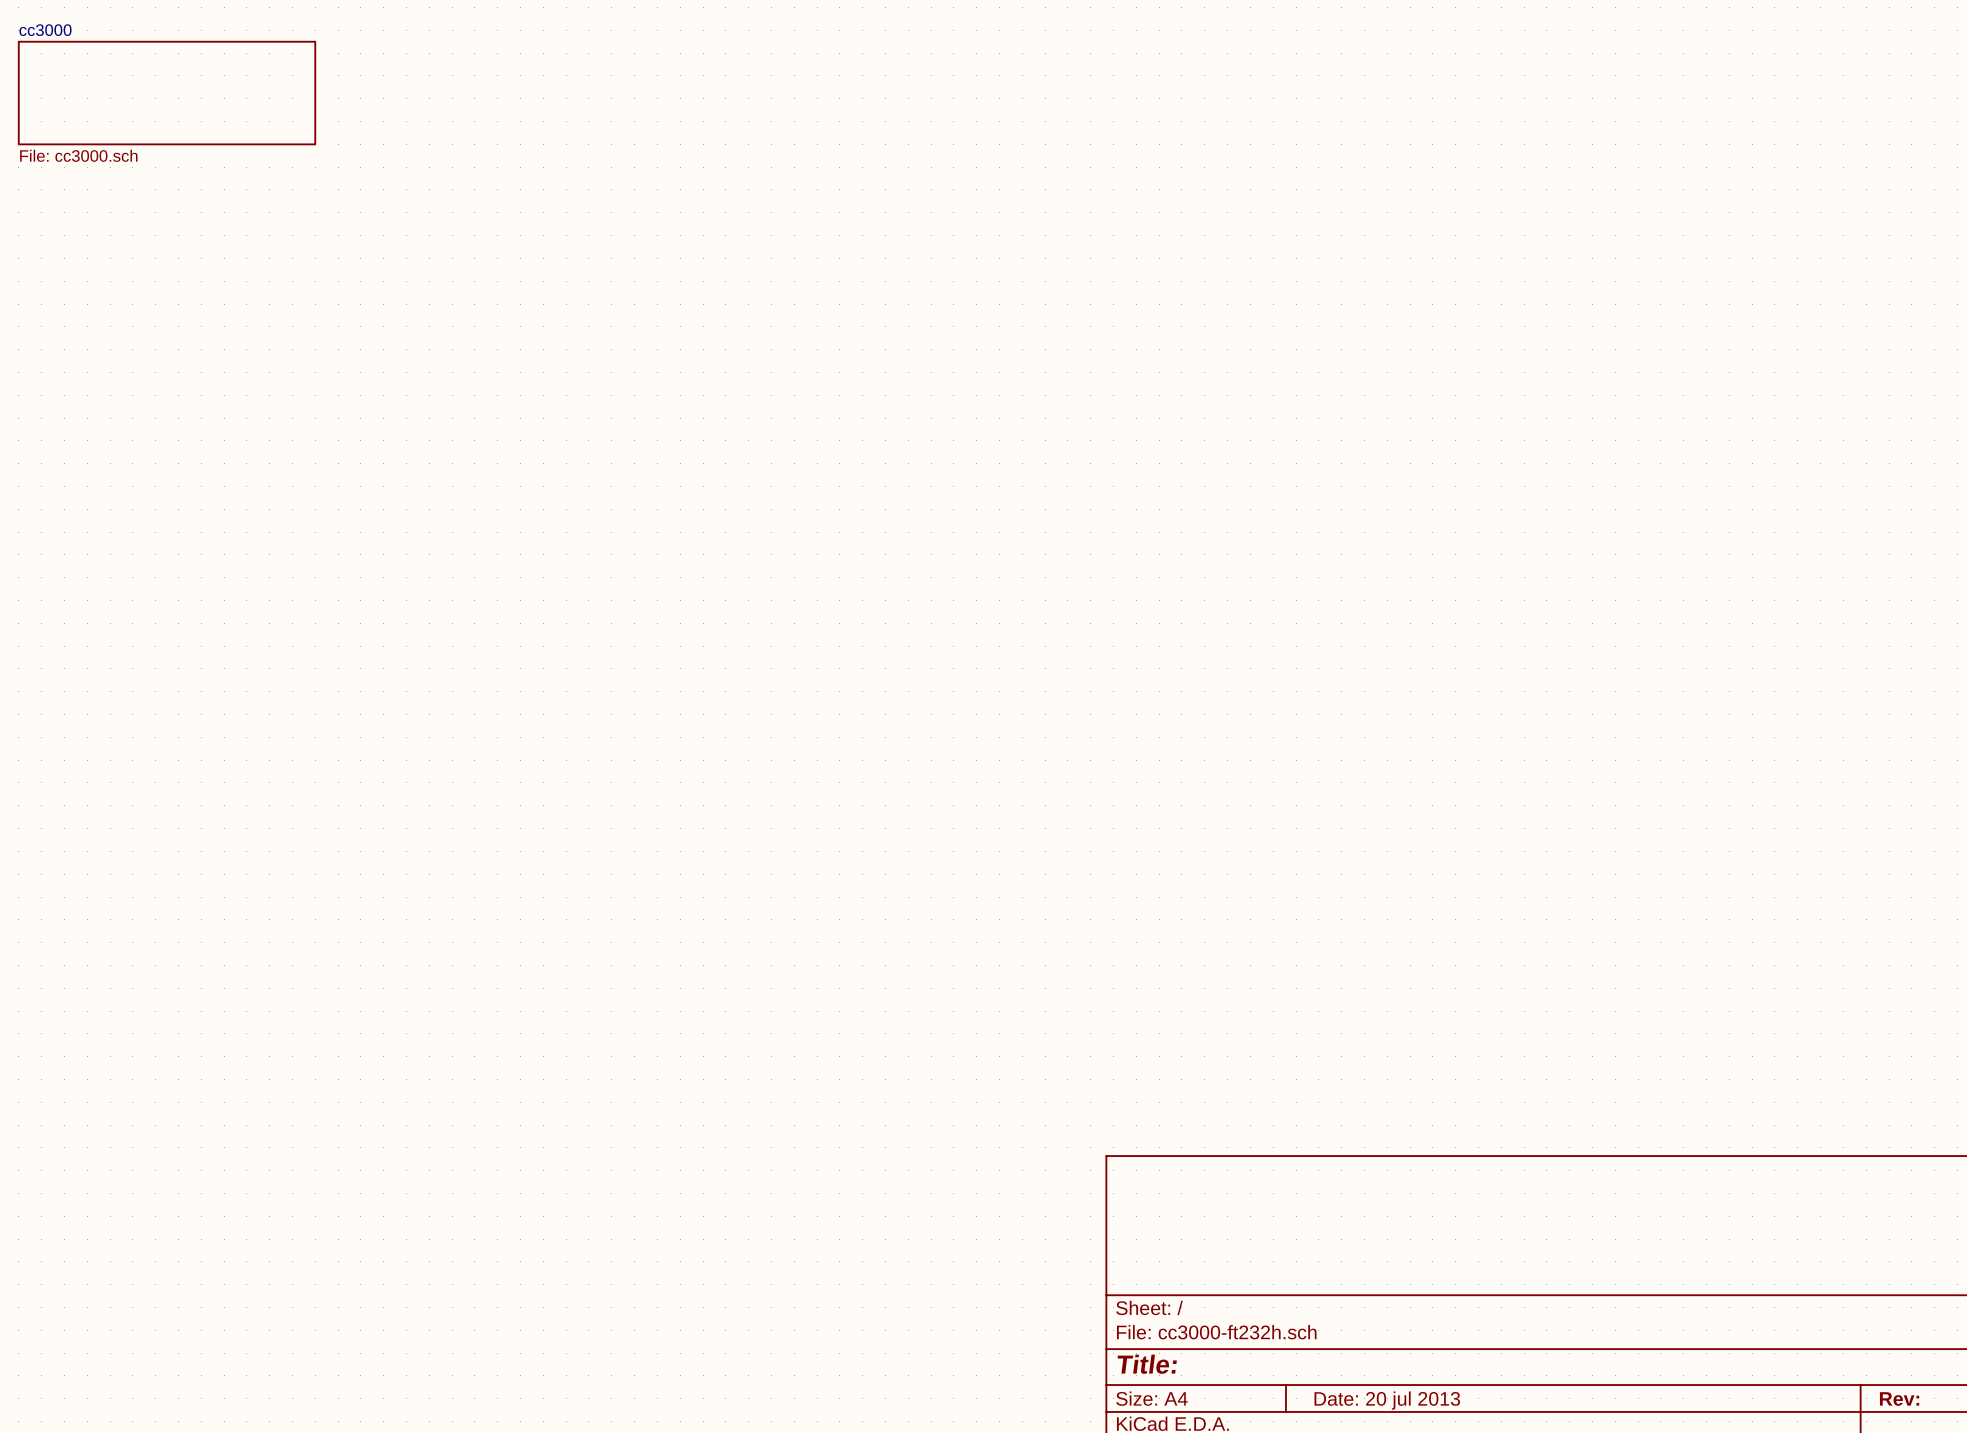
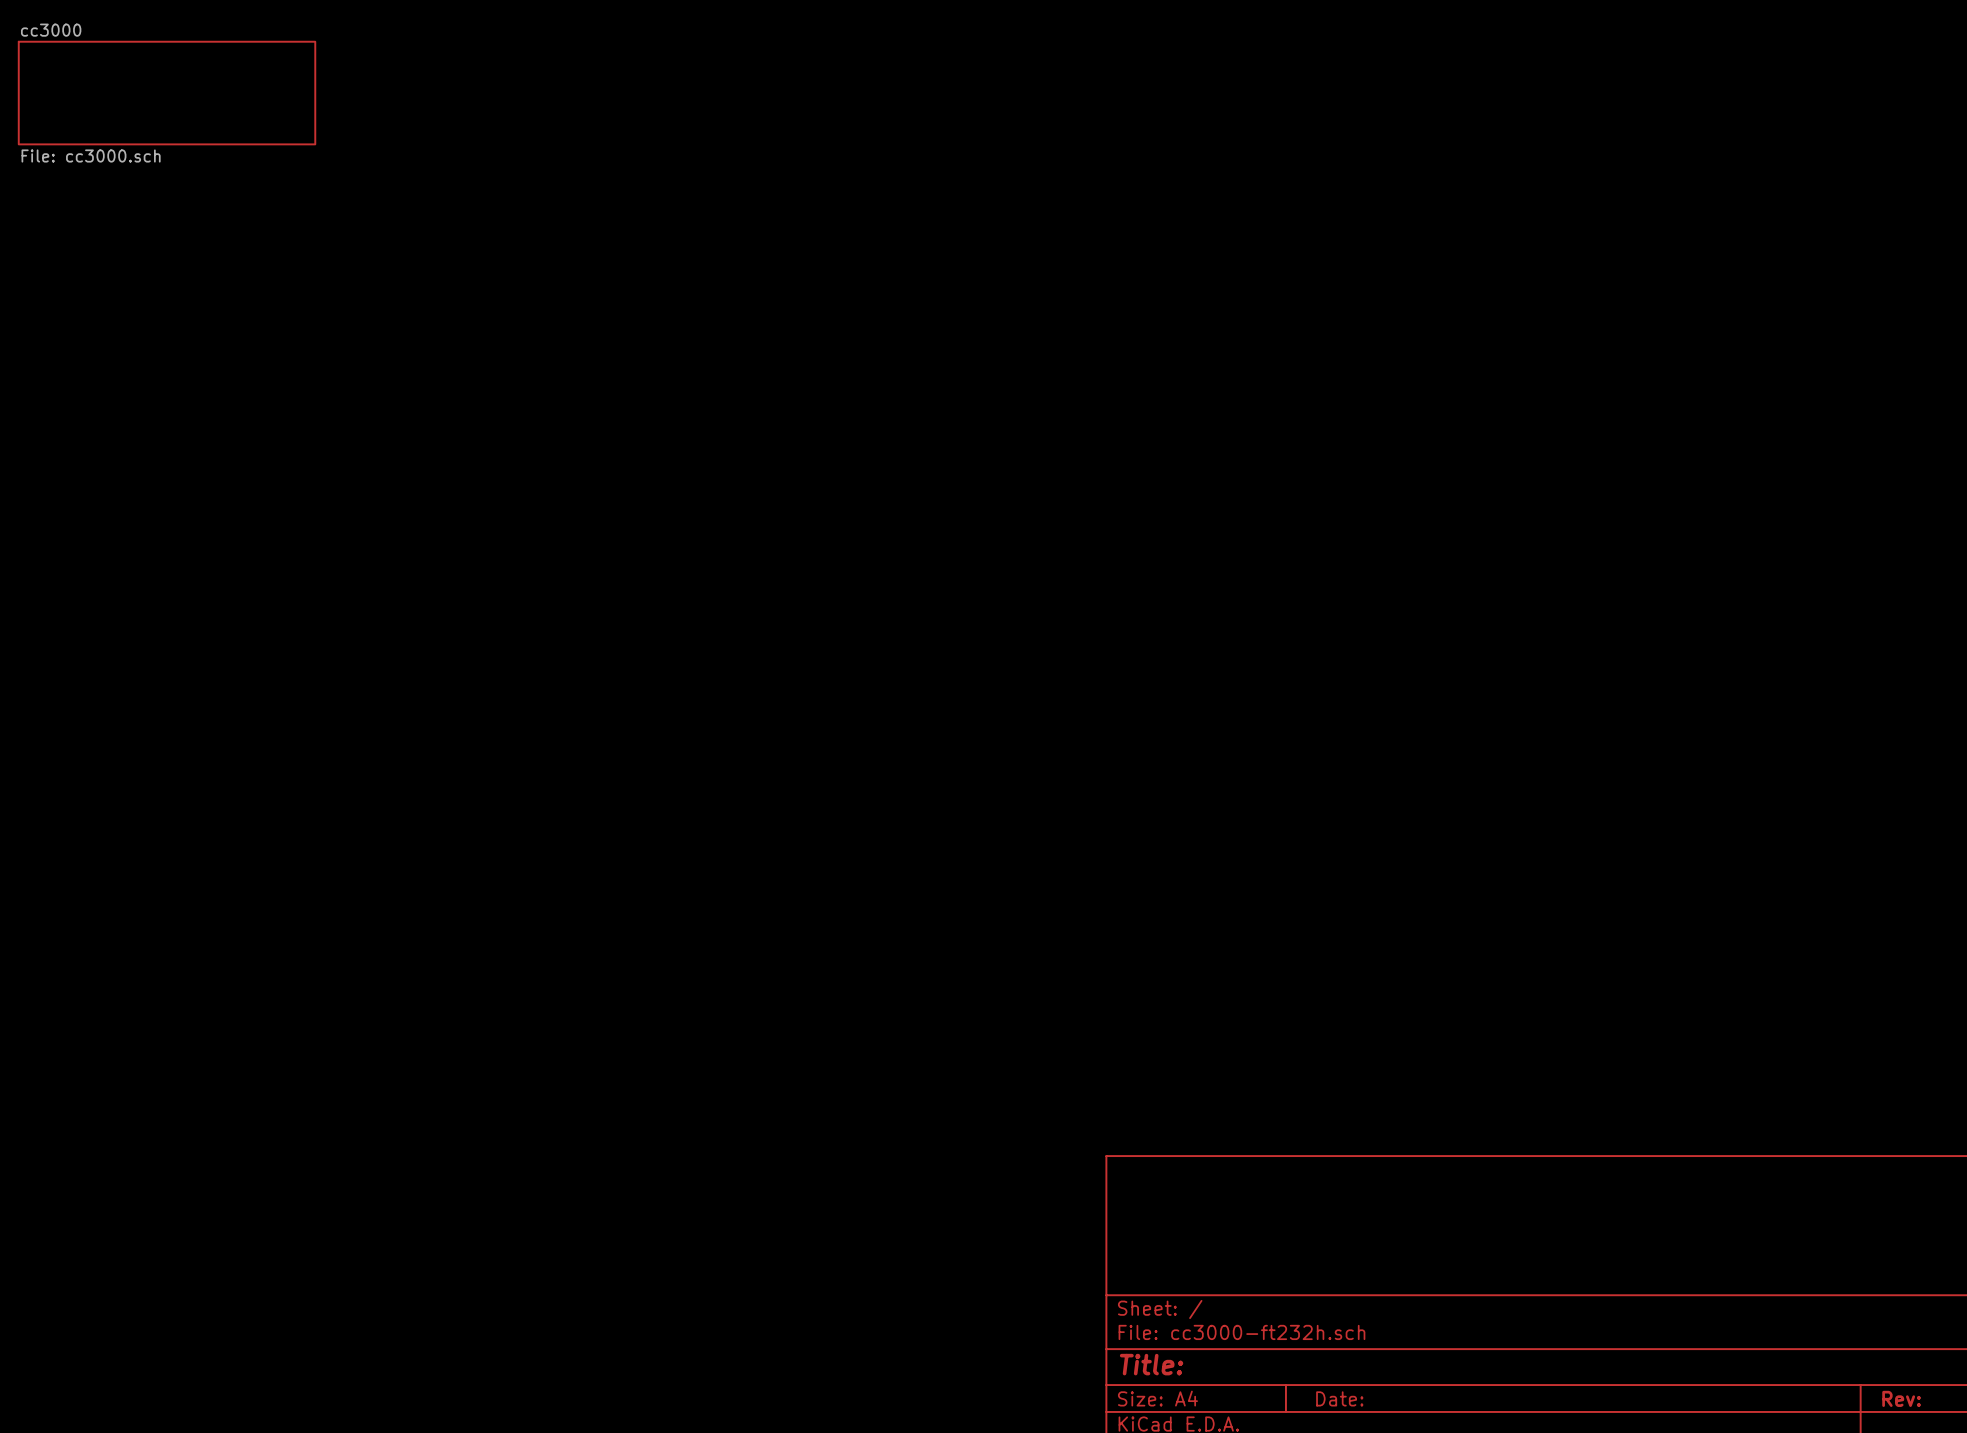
title block: Date: 20 jul 2013 (1387, 1400) -> Date: (1339, 1398)

